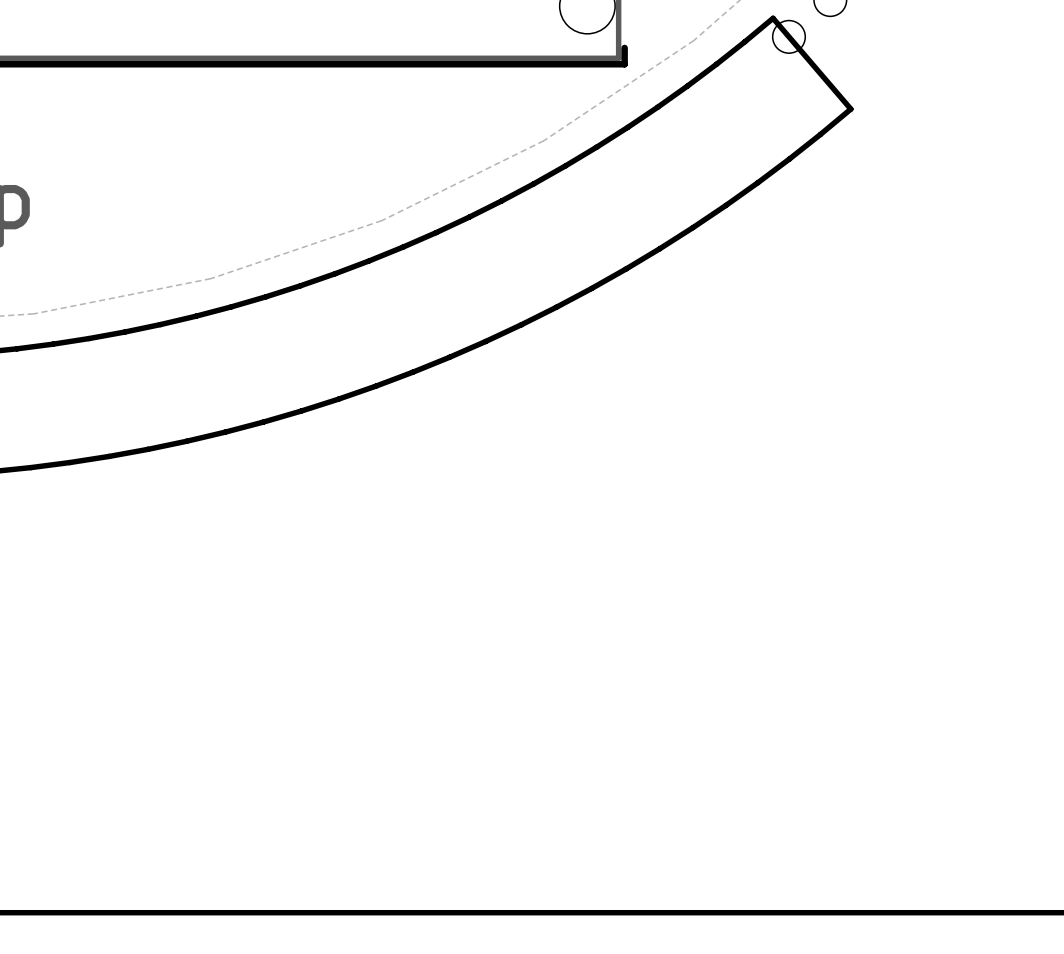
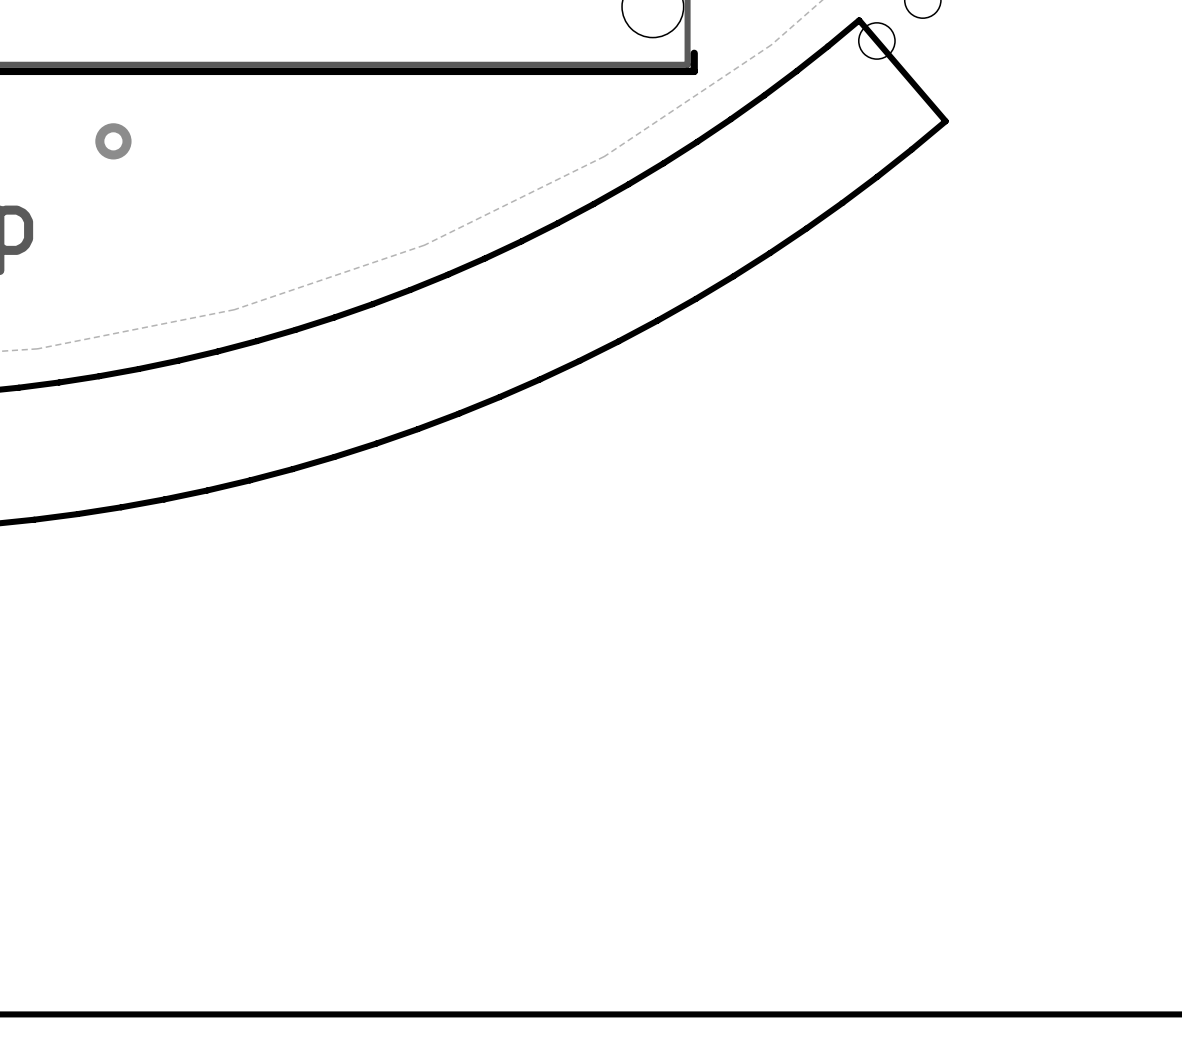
via: none -> (113, 141)

